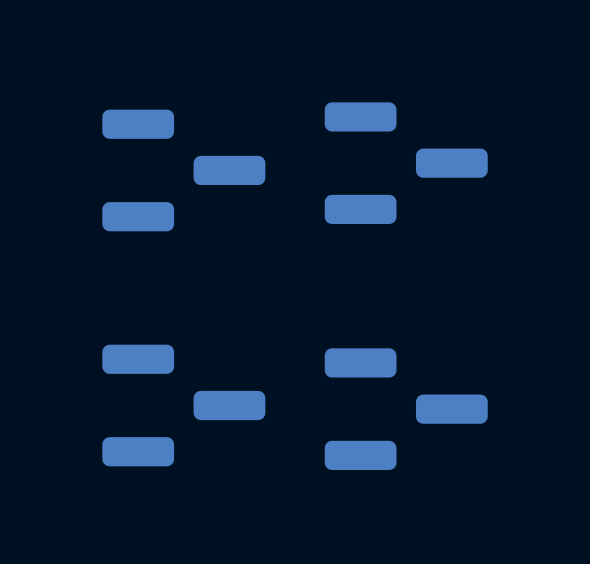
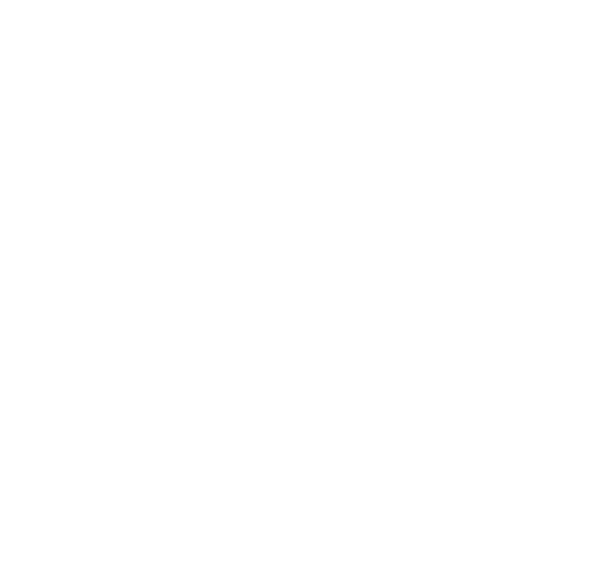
part: (406, 163) -> none
part: (183, 170) -> none
part: (183, 405) -> none
part: (406, 409) -> none

